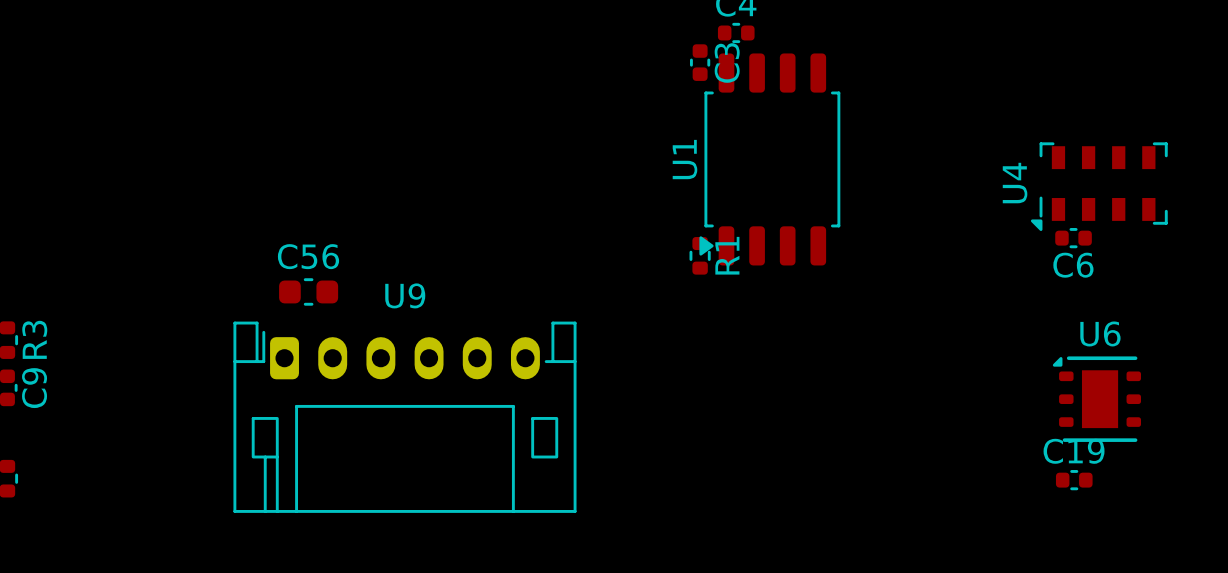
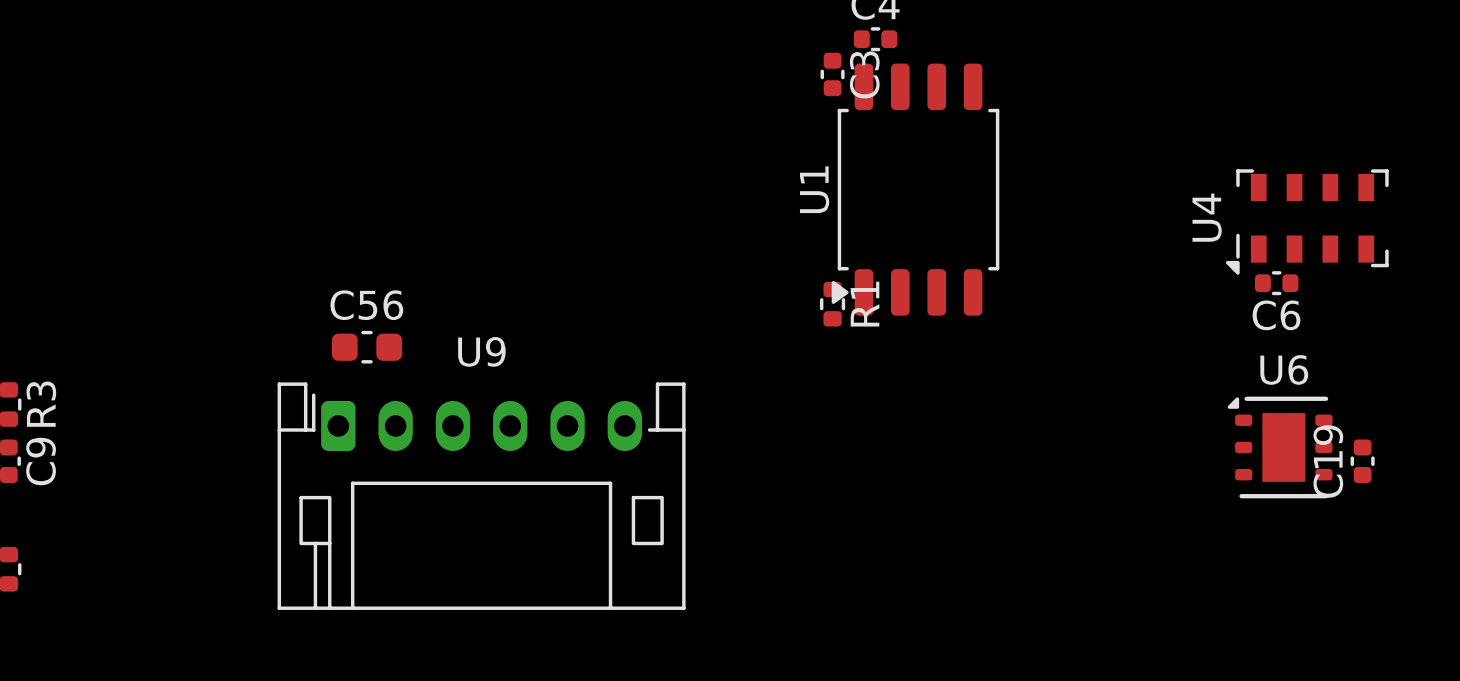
U6 position: (1096, 399) -> (1280, 447)
C19 rotation: 0° (1074, 480) -> 90° clockwise (1362, 461)
C19 position: (1074, 480) -> (1362, 461)

